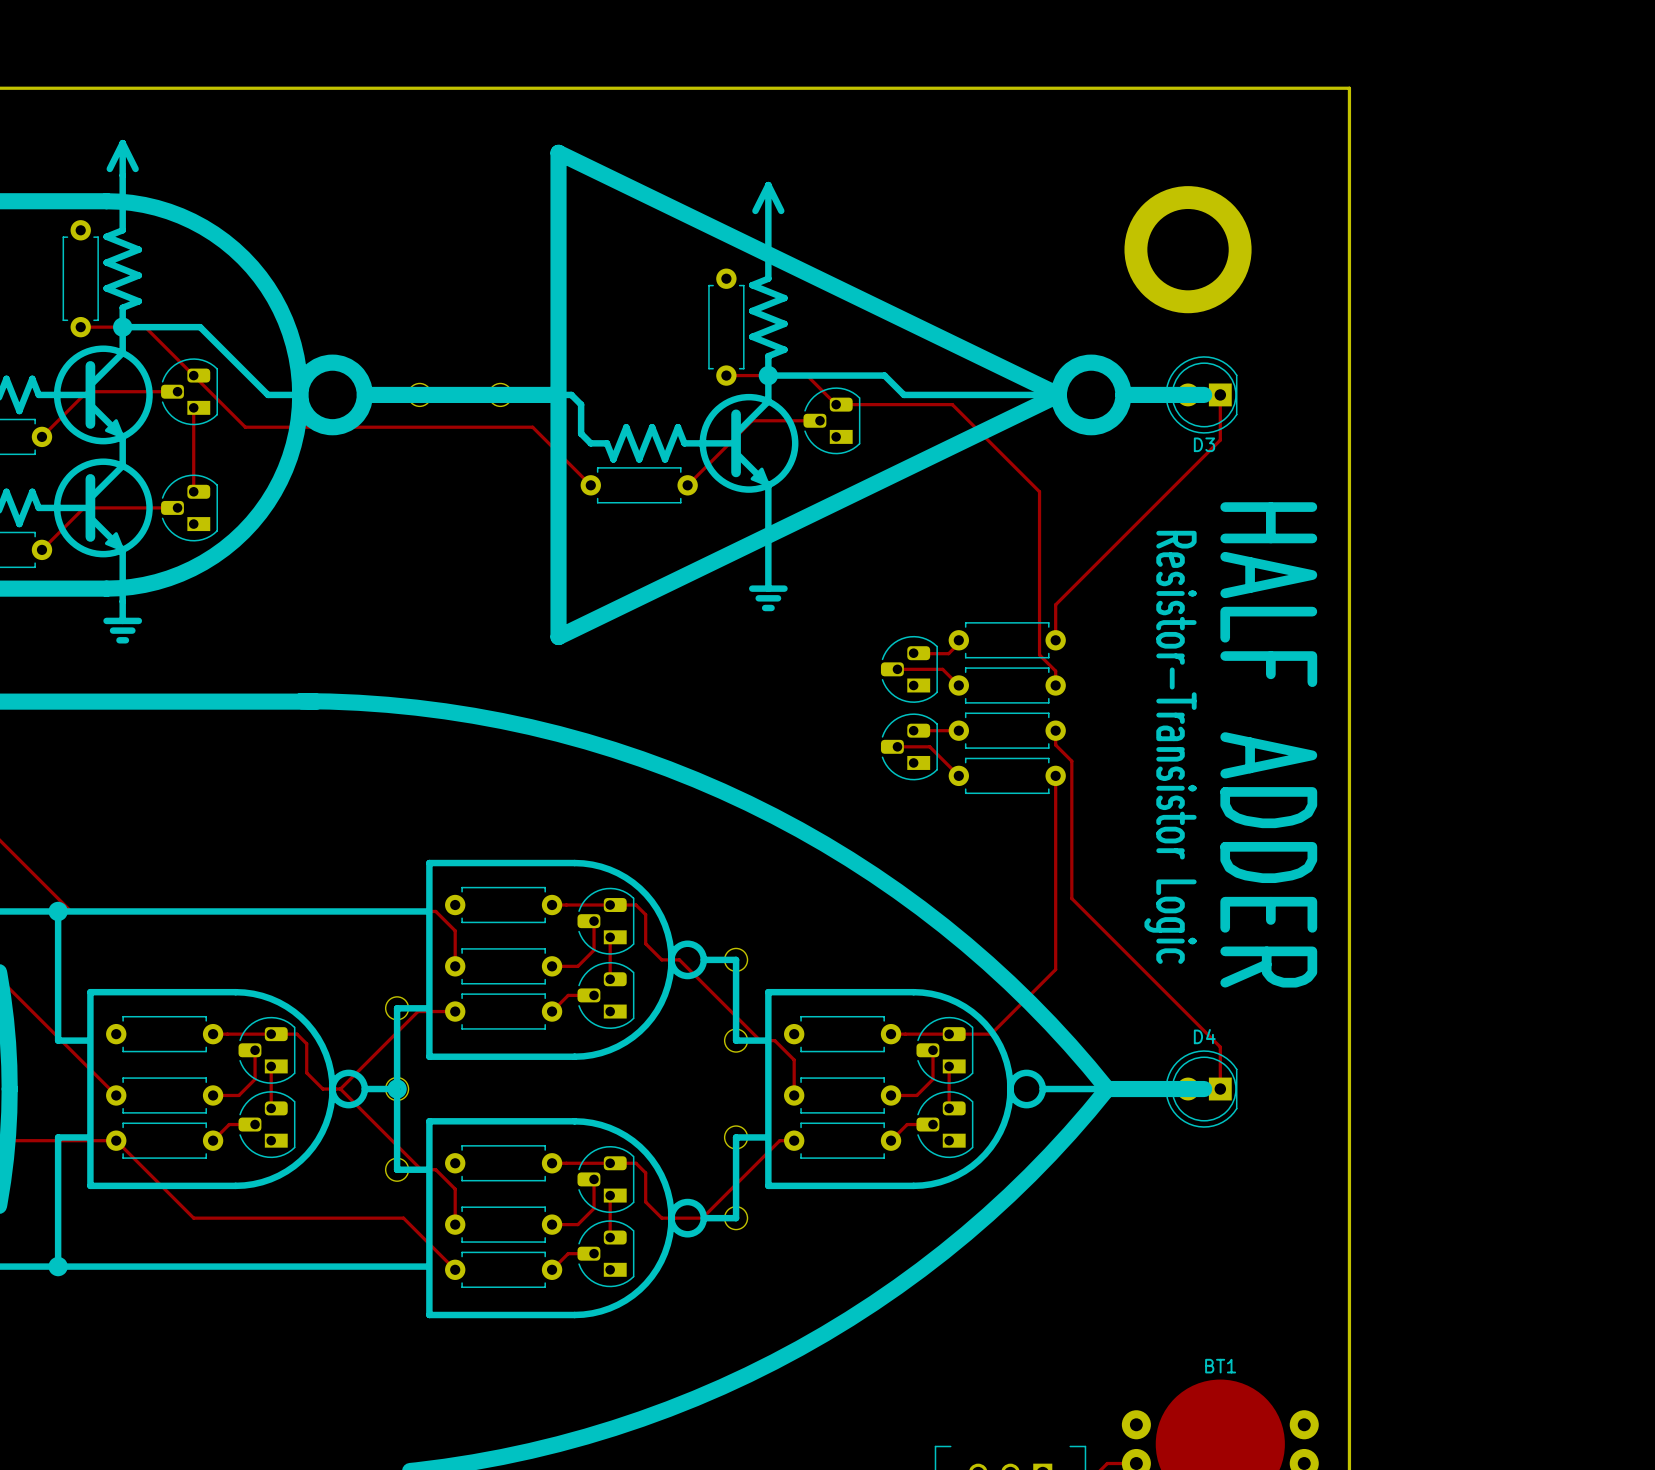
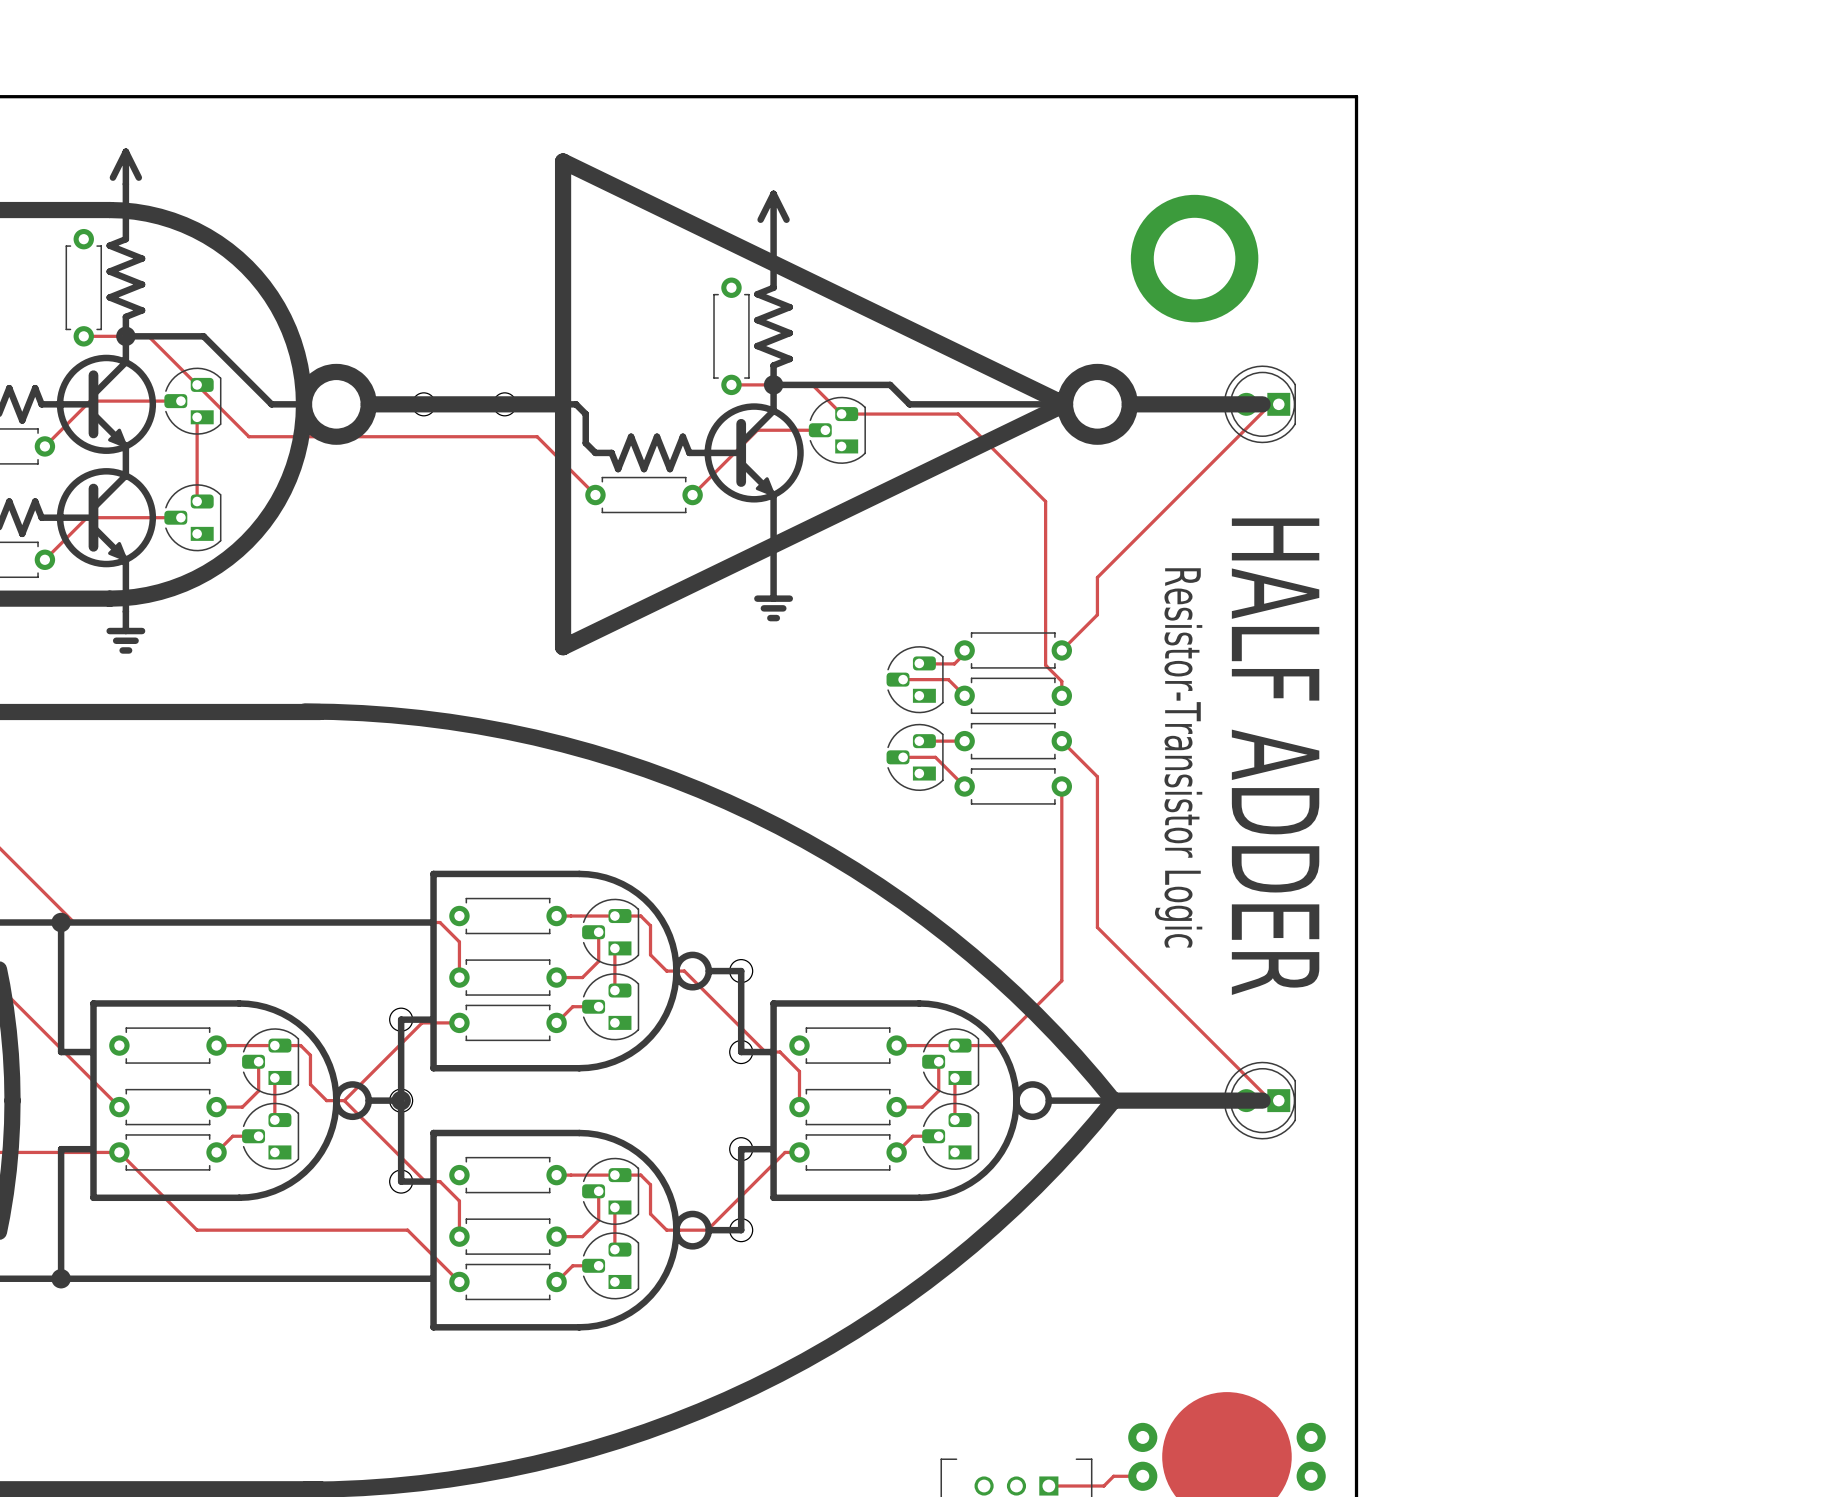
D3: (1201, 394) -> none
line: none -> (1210, 404) (1262, 404)
track: (1220, 394) (1220, 440) (1055, 604) (1055, 640) -> (1278, 404) (1270, 404) (1097, 577) (1097, 614) (1061, 650)
part: none -> (1259, 404)
track: (1055, 730) (1055, 745) (1071, 761) (1071, 898) (1220, 1047) (1220, 1089) -> (1061, 741) (1097, 776) (1097, 927) (1270, 1100) (1278, 1100)
D4: (1201, 1089) -> none
line: none -> (1210, 1100) (1262, 1100)
part: none -> (1259, 1100)
BT1 name: BT1 (1220, 1366) -> none

